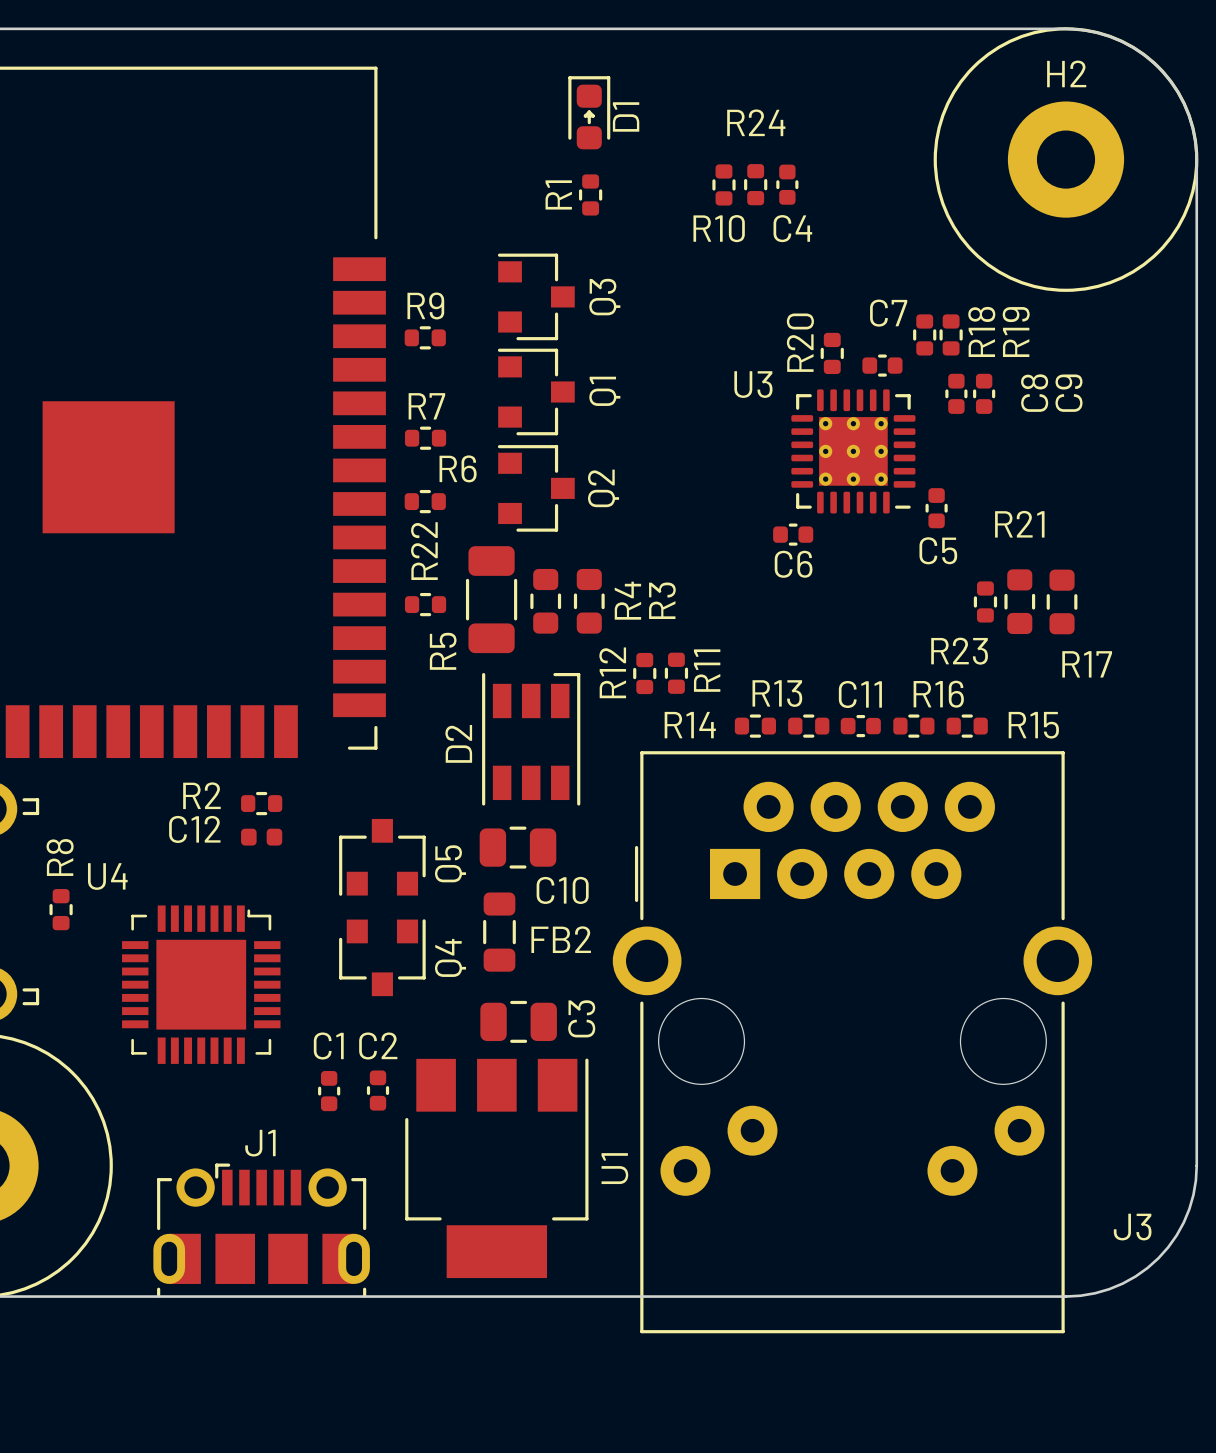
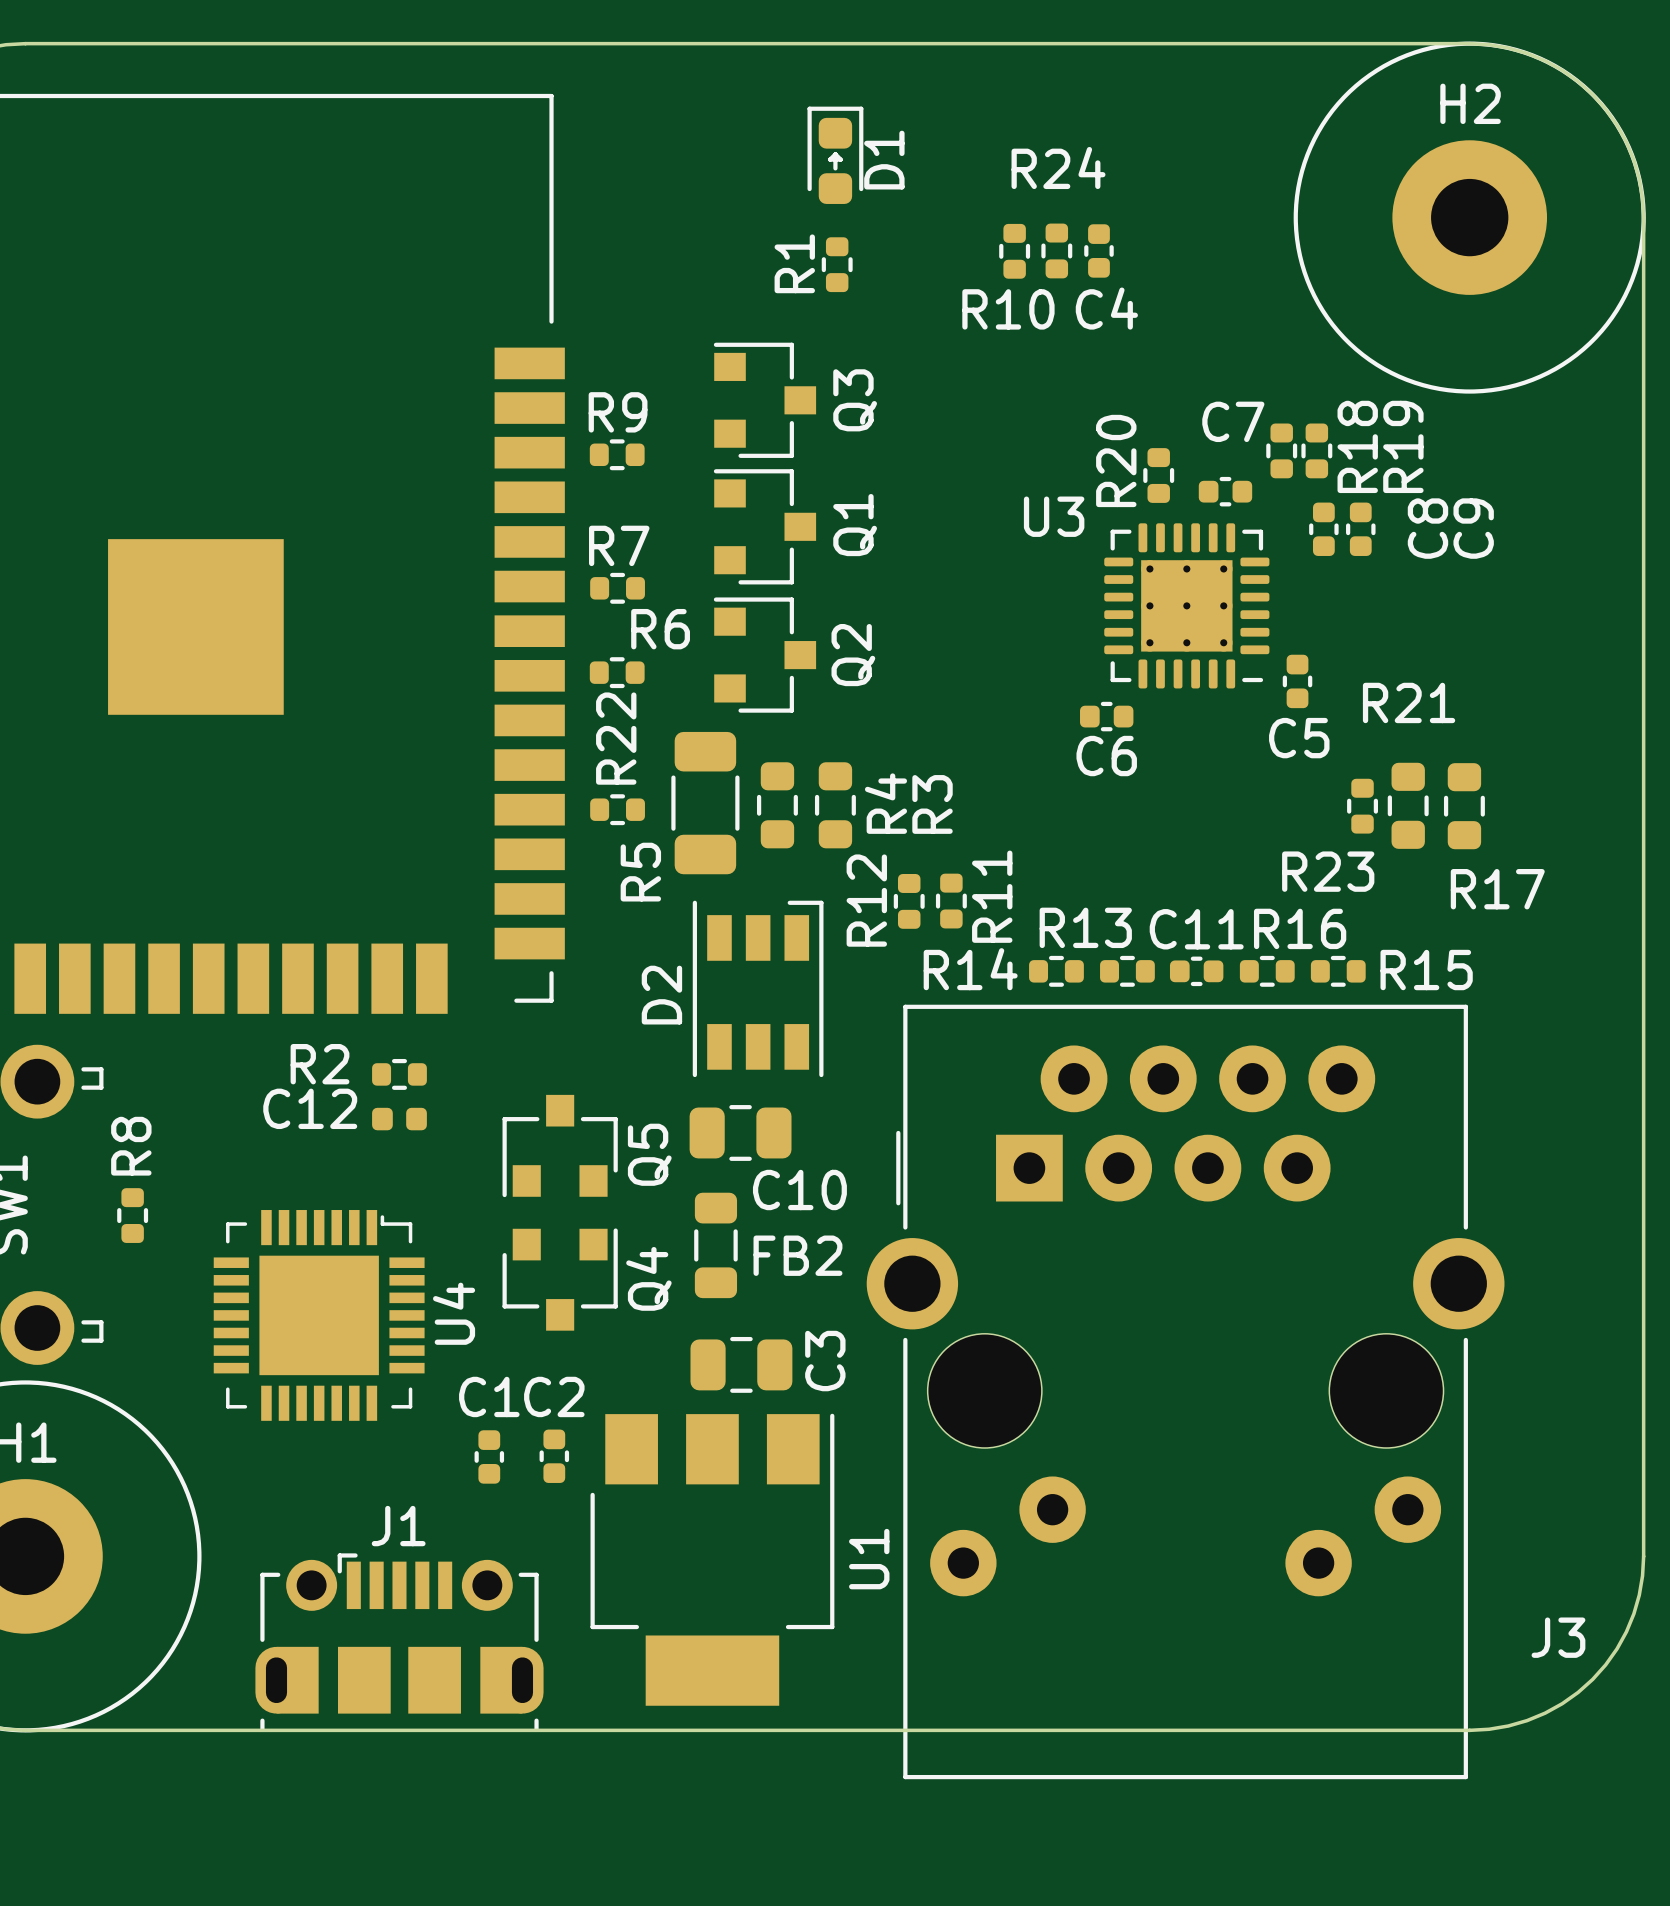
U4 name rotation: 0° (107, 876) -> 90° counterclockwise (454, 1313)
U4 name position: U4 (107, 876) -> U4 (454, 1313)

